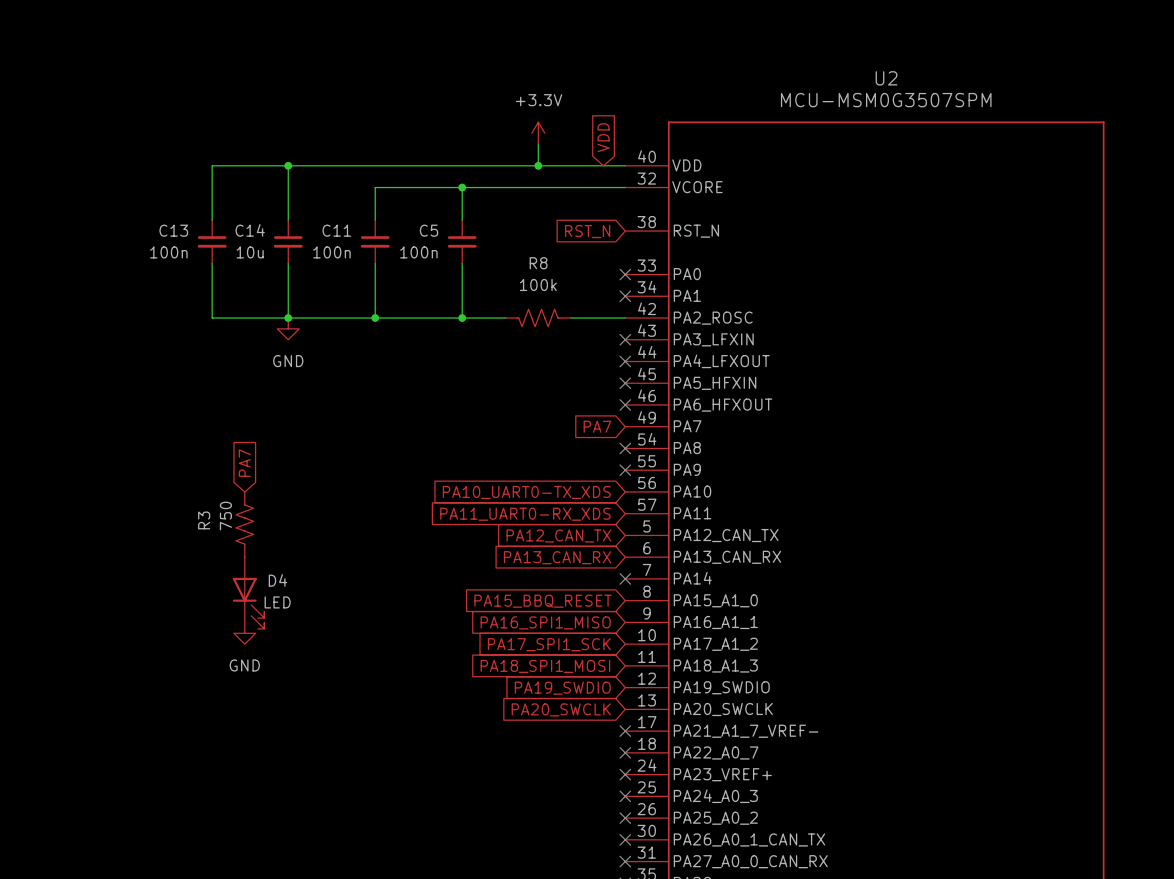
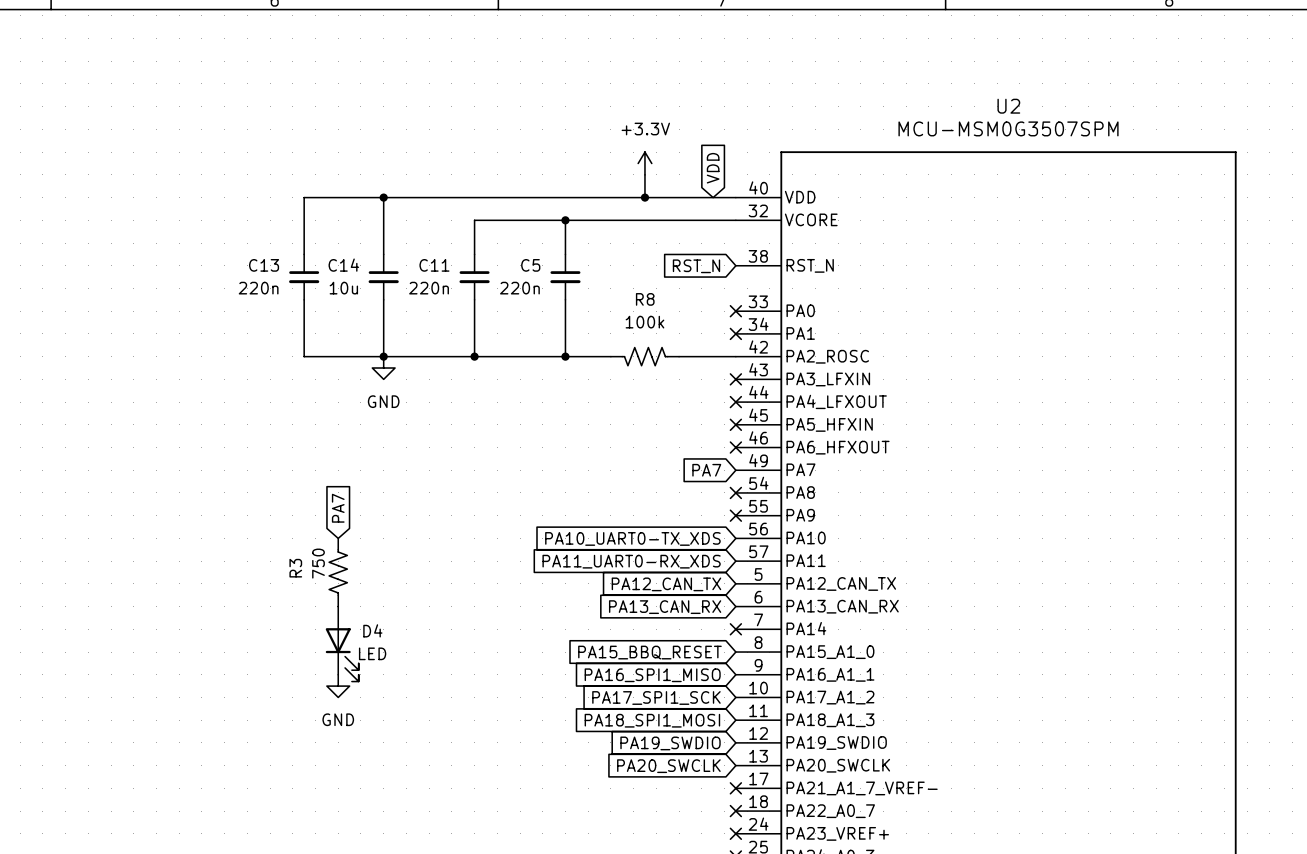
C13 value: 100n (168, 252) -> 220n (258, 288)
C11 value: 100n (331, 252) -> 220n (429, 288)
C5 value: 100n (418, 252) -> 220n (519, 288)

